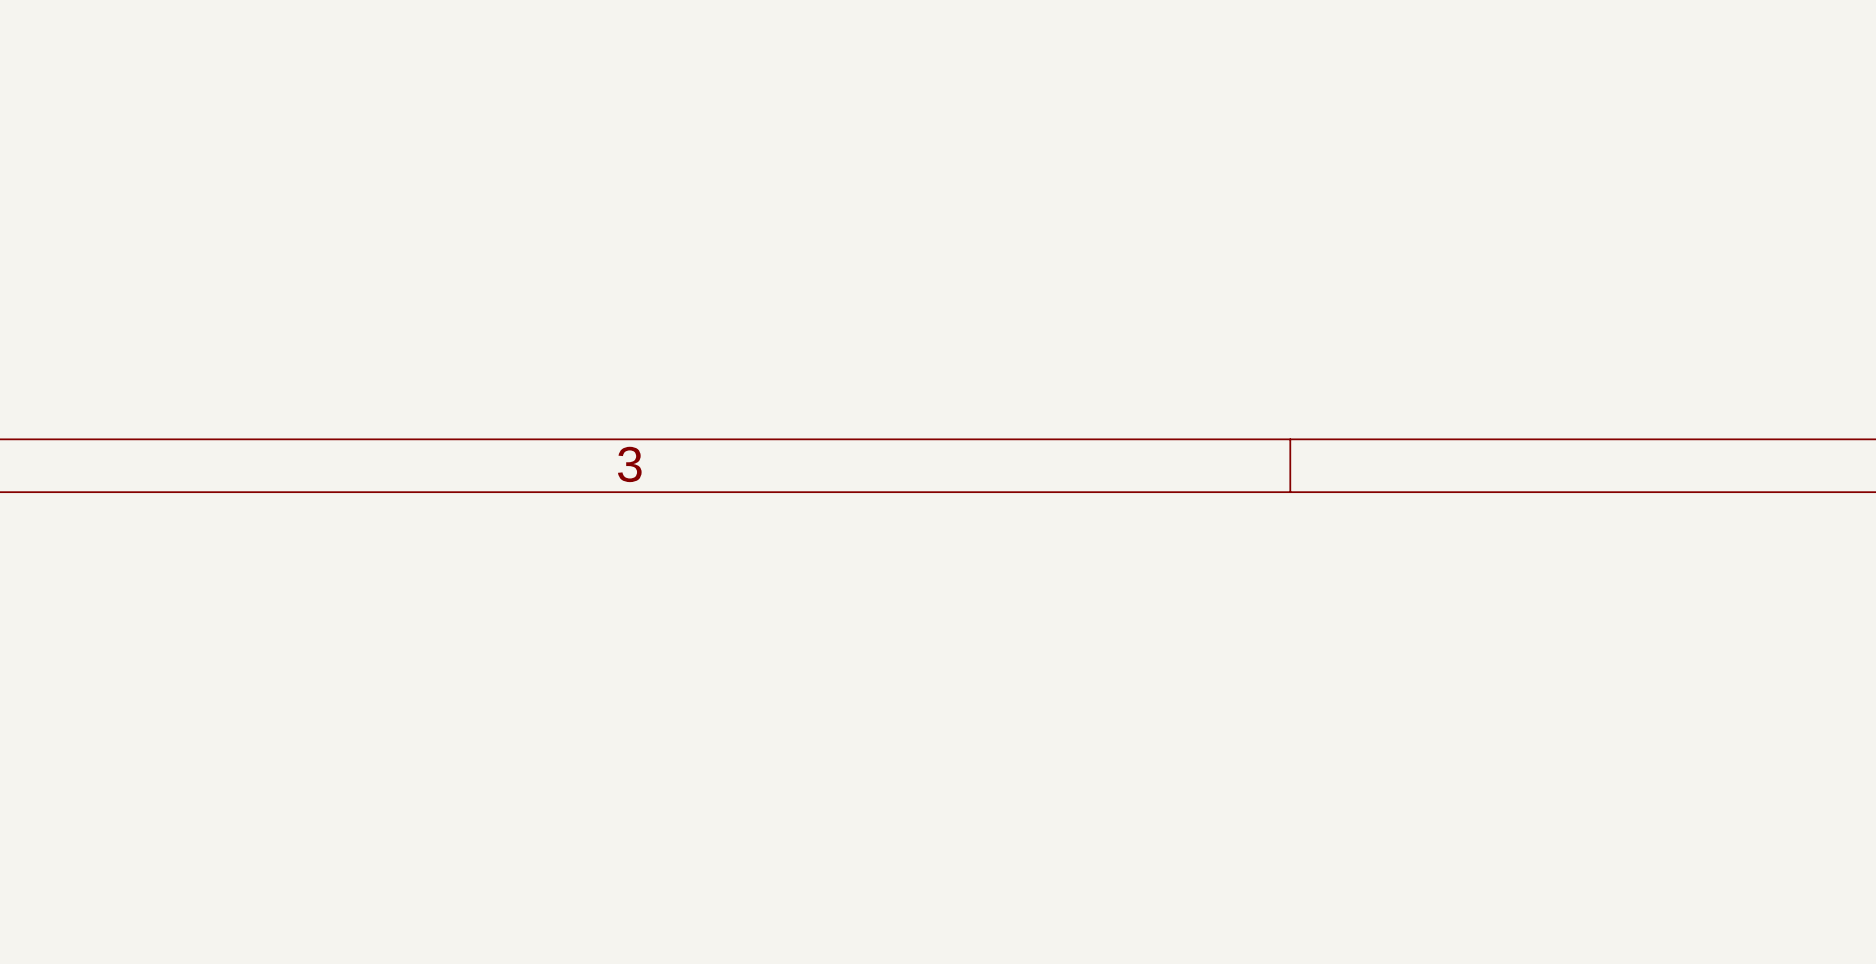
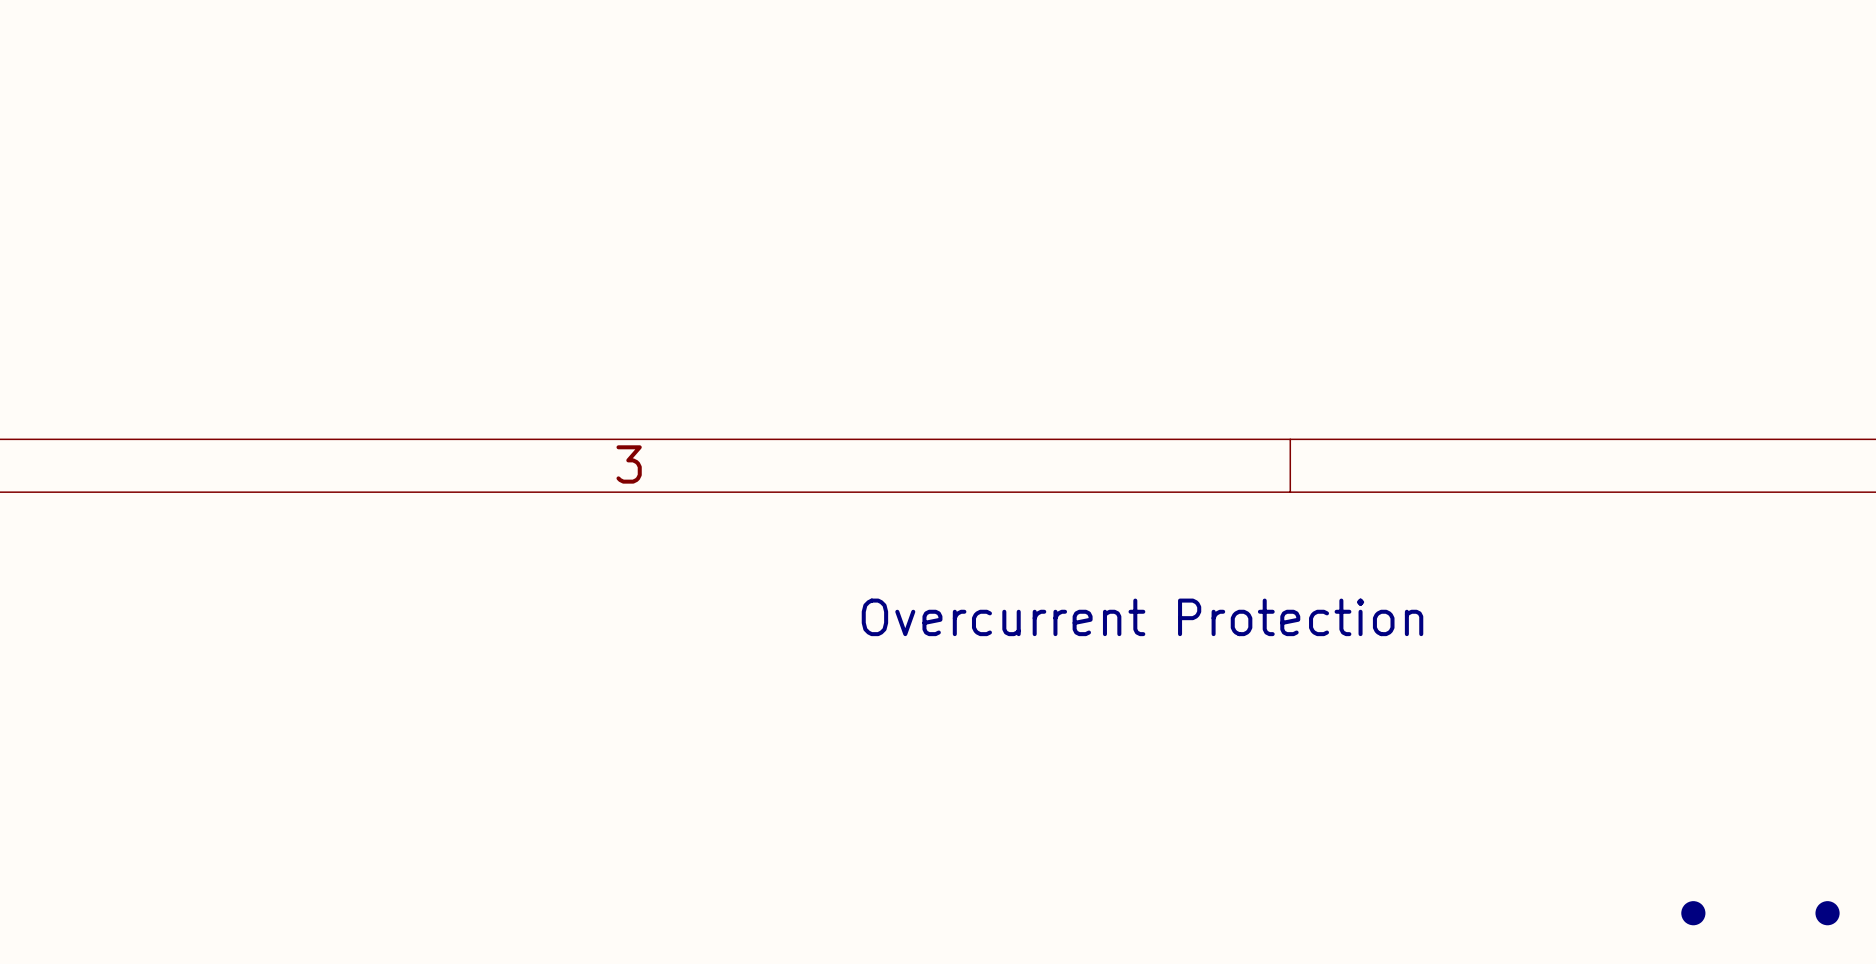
text: none -> Overcurrent Protection (1142, 617)
junction: none -> (1693, 913)
junction: none -> (1827, 913)

